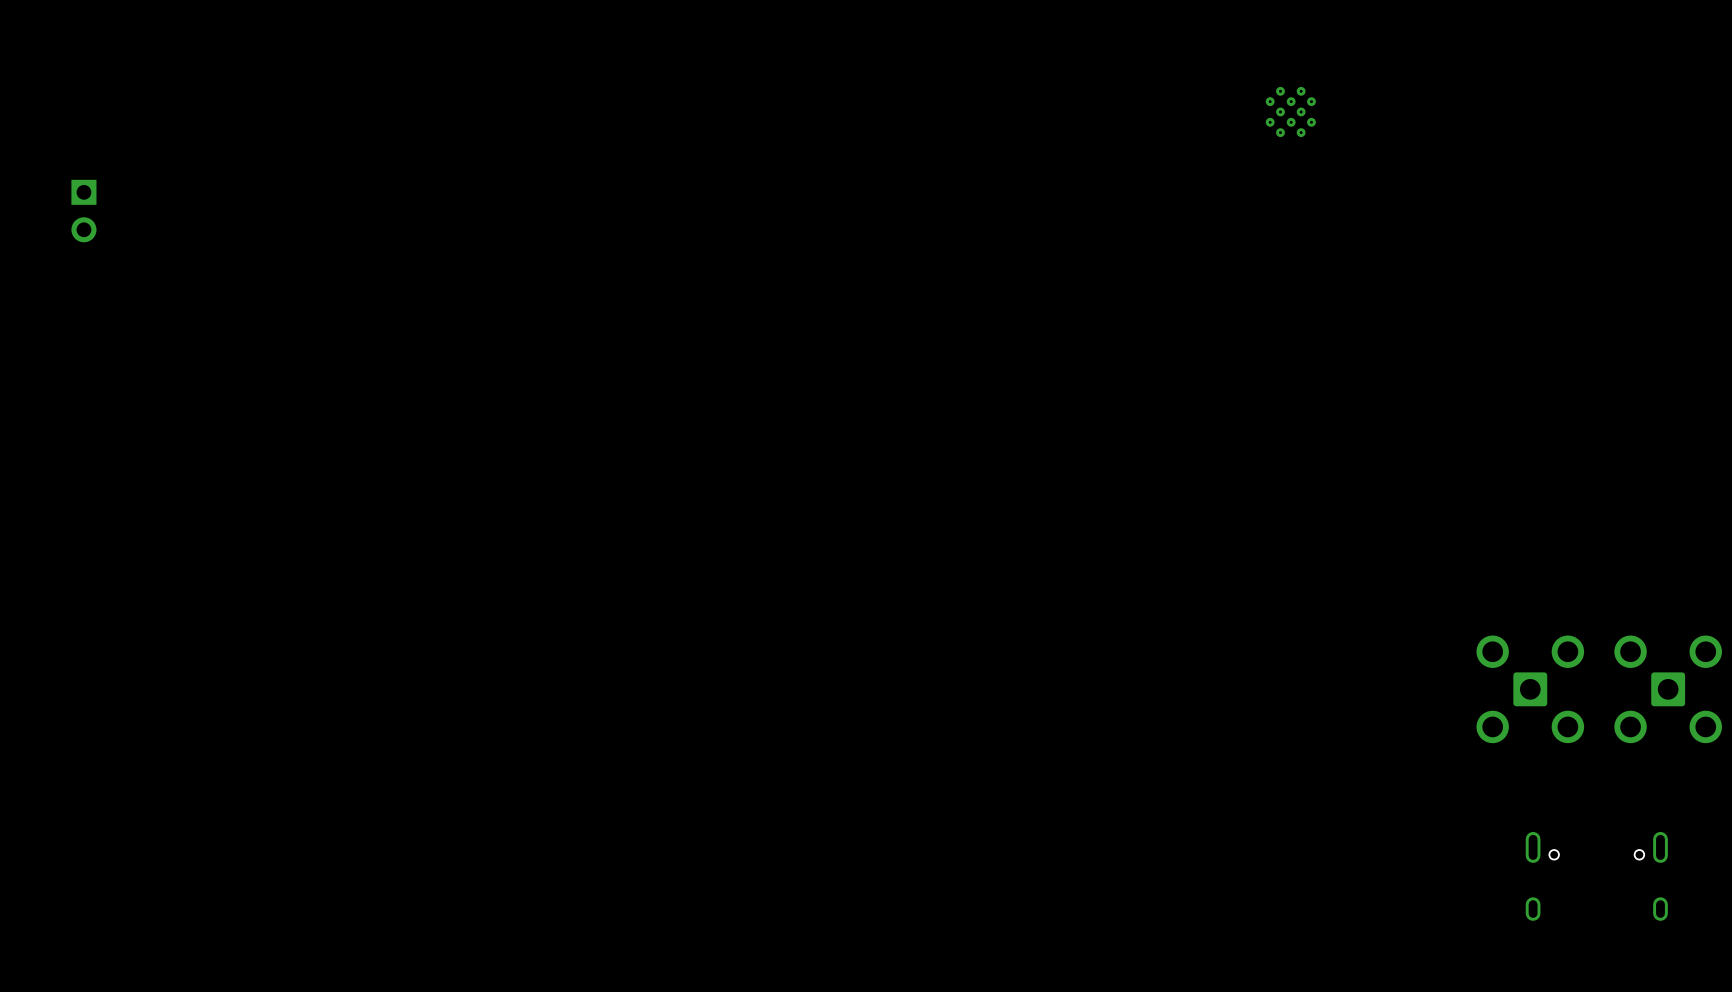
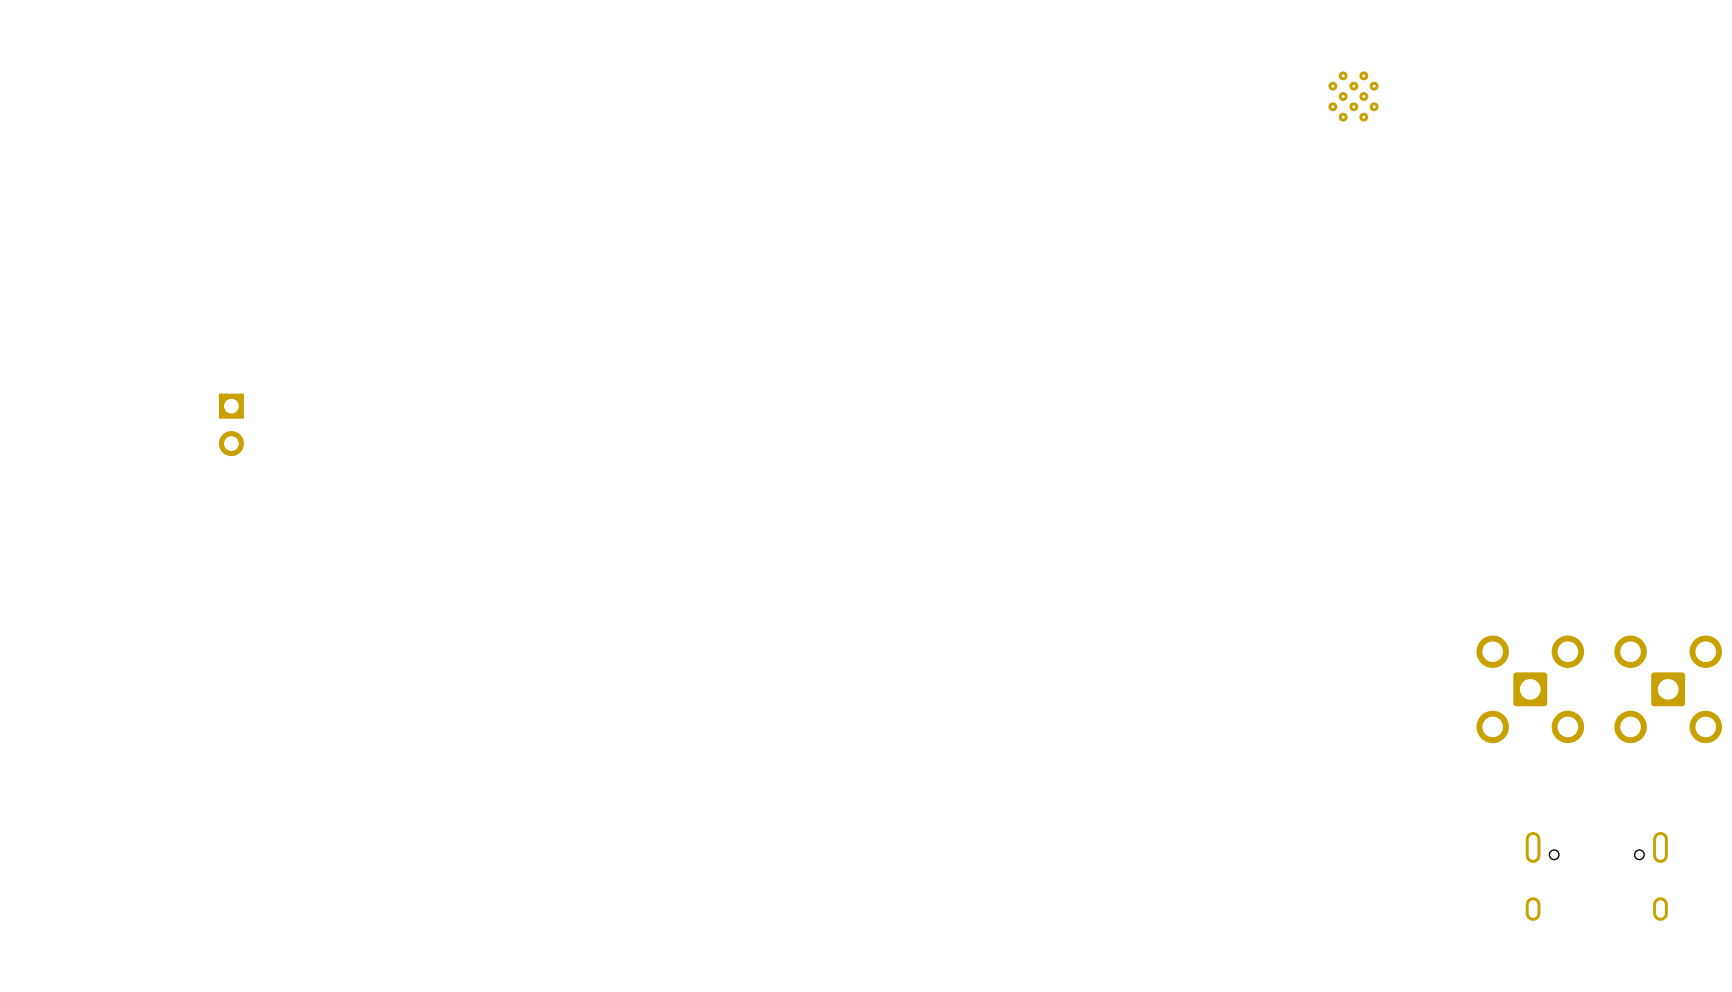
part position: (1290, 111) -> (1353, 96)
part position: (83, 211) -> (231, 424)

